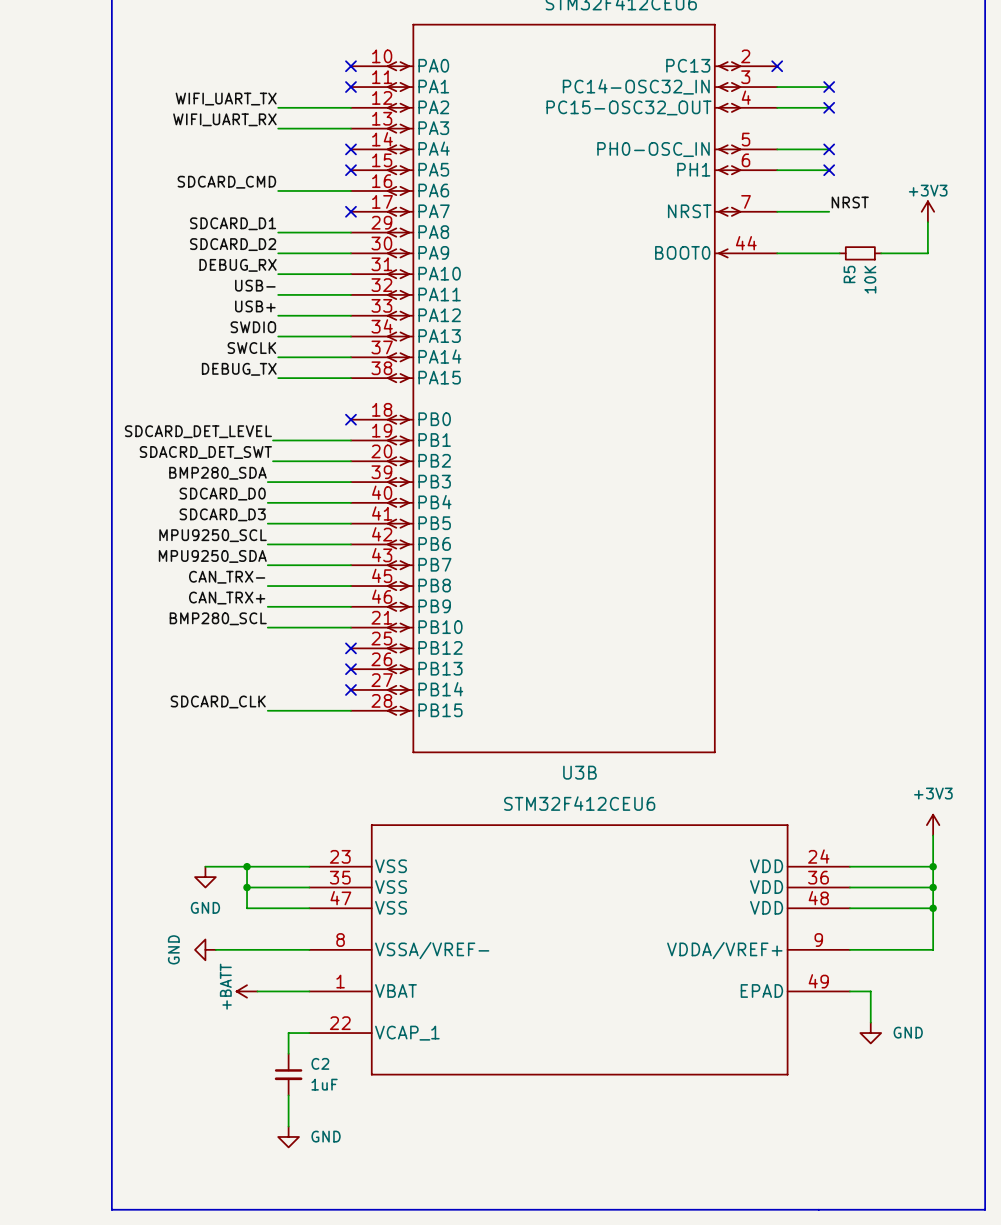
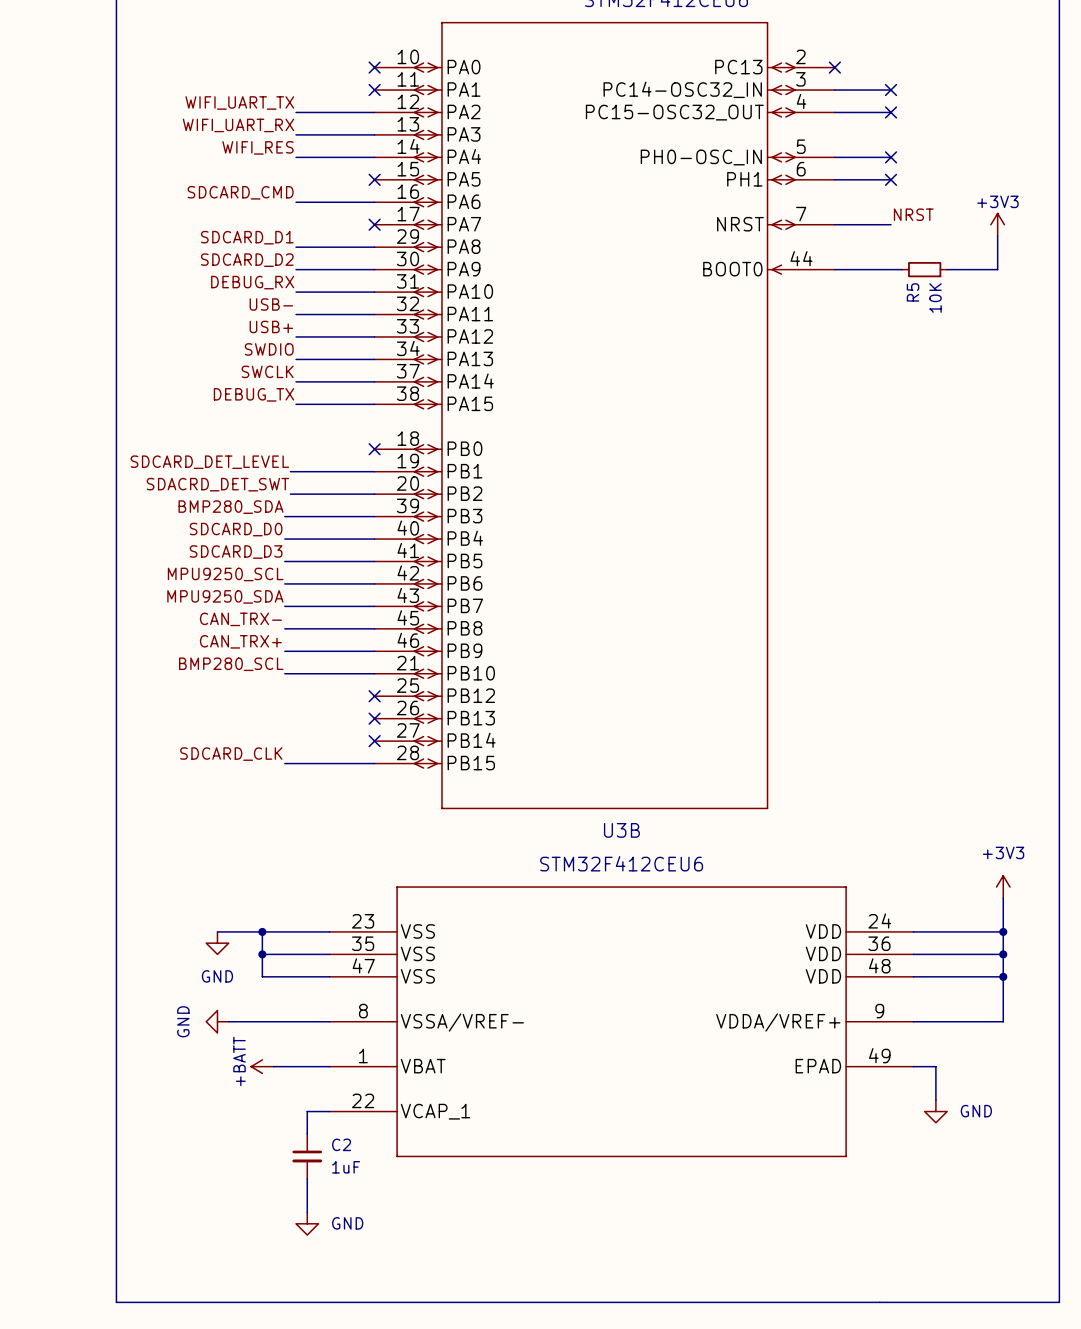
label: none -> WIFI_RES (258, 147)
wire: none -> (296, 157) (374, 157)
no-connect mark: (350, 149) -> none

